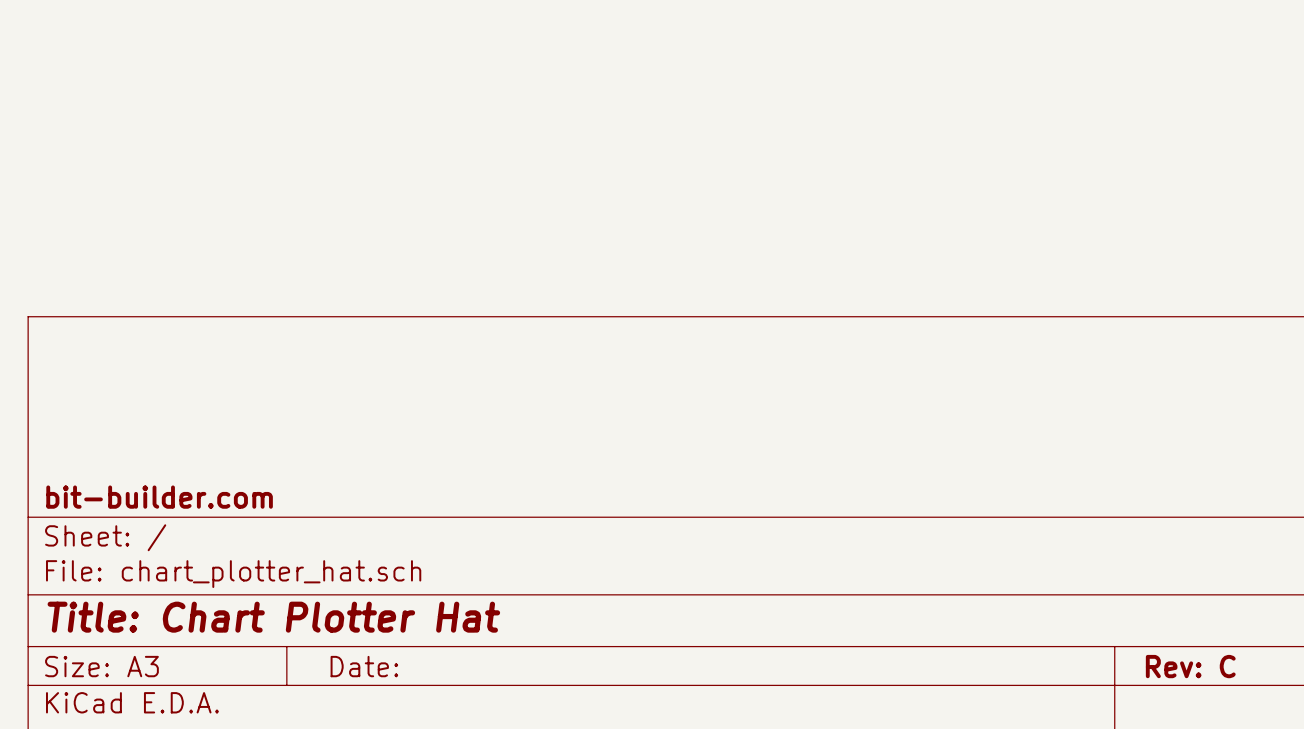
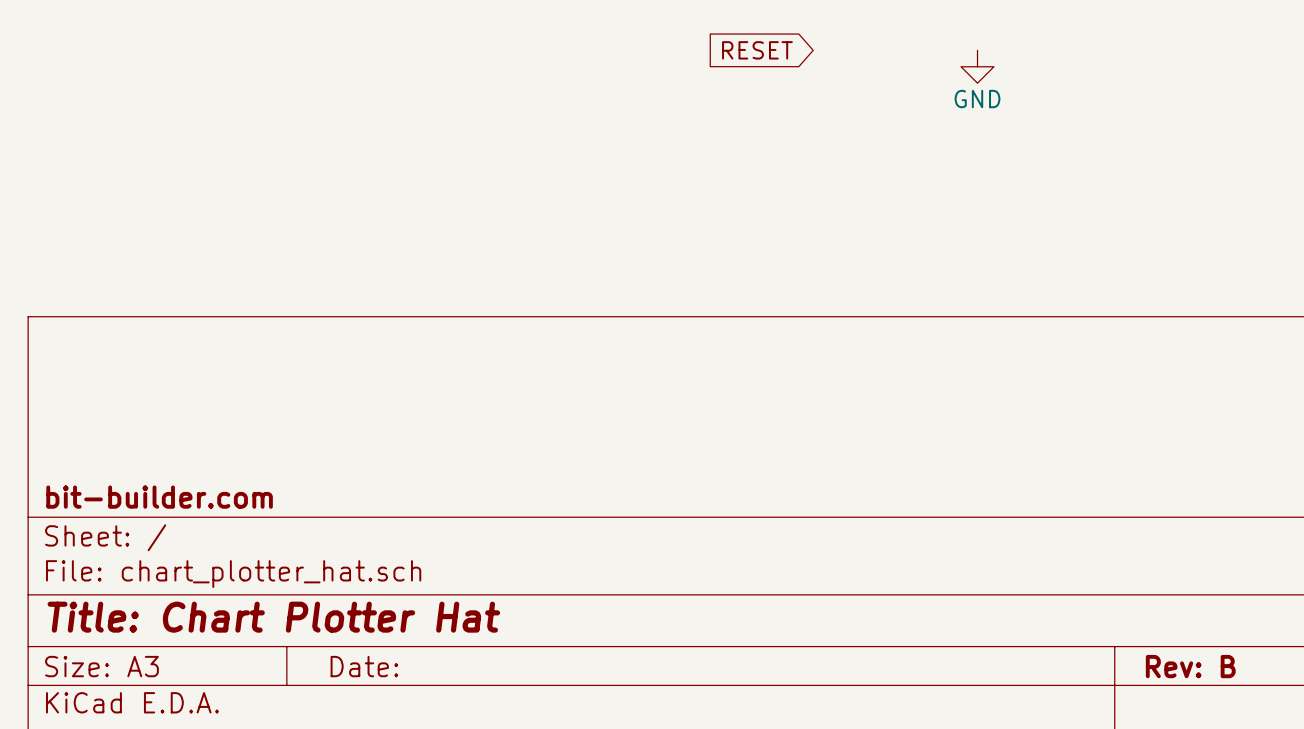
global label: none -> RESET (757, 50)
power symbol: none -> GND (977, 66)
title block: Rev: C (1190, 666) -> Rev: B (1190, 666)

